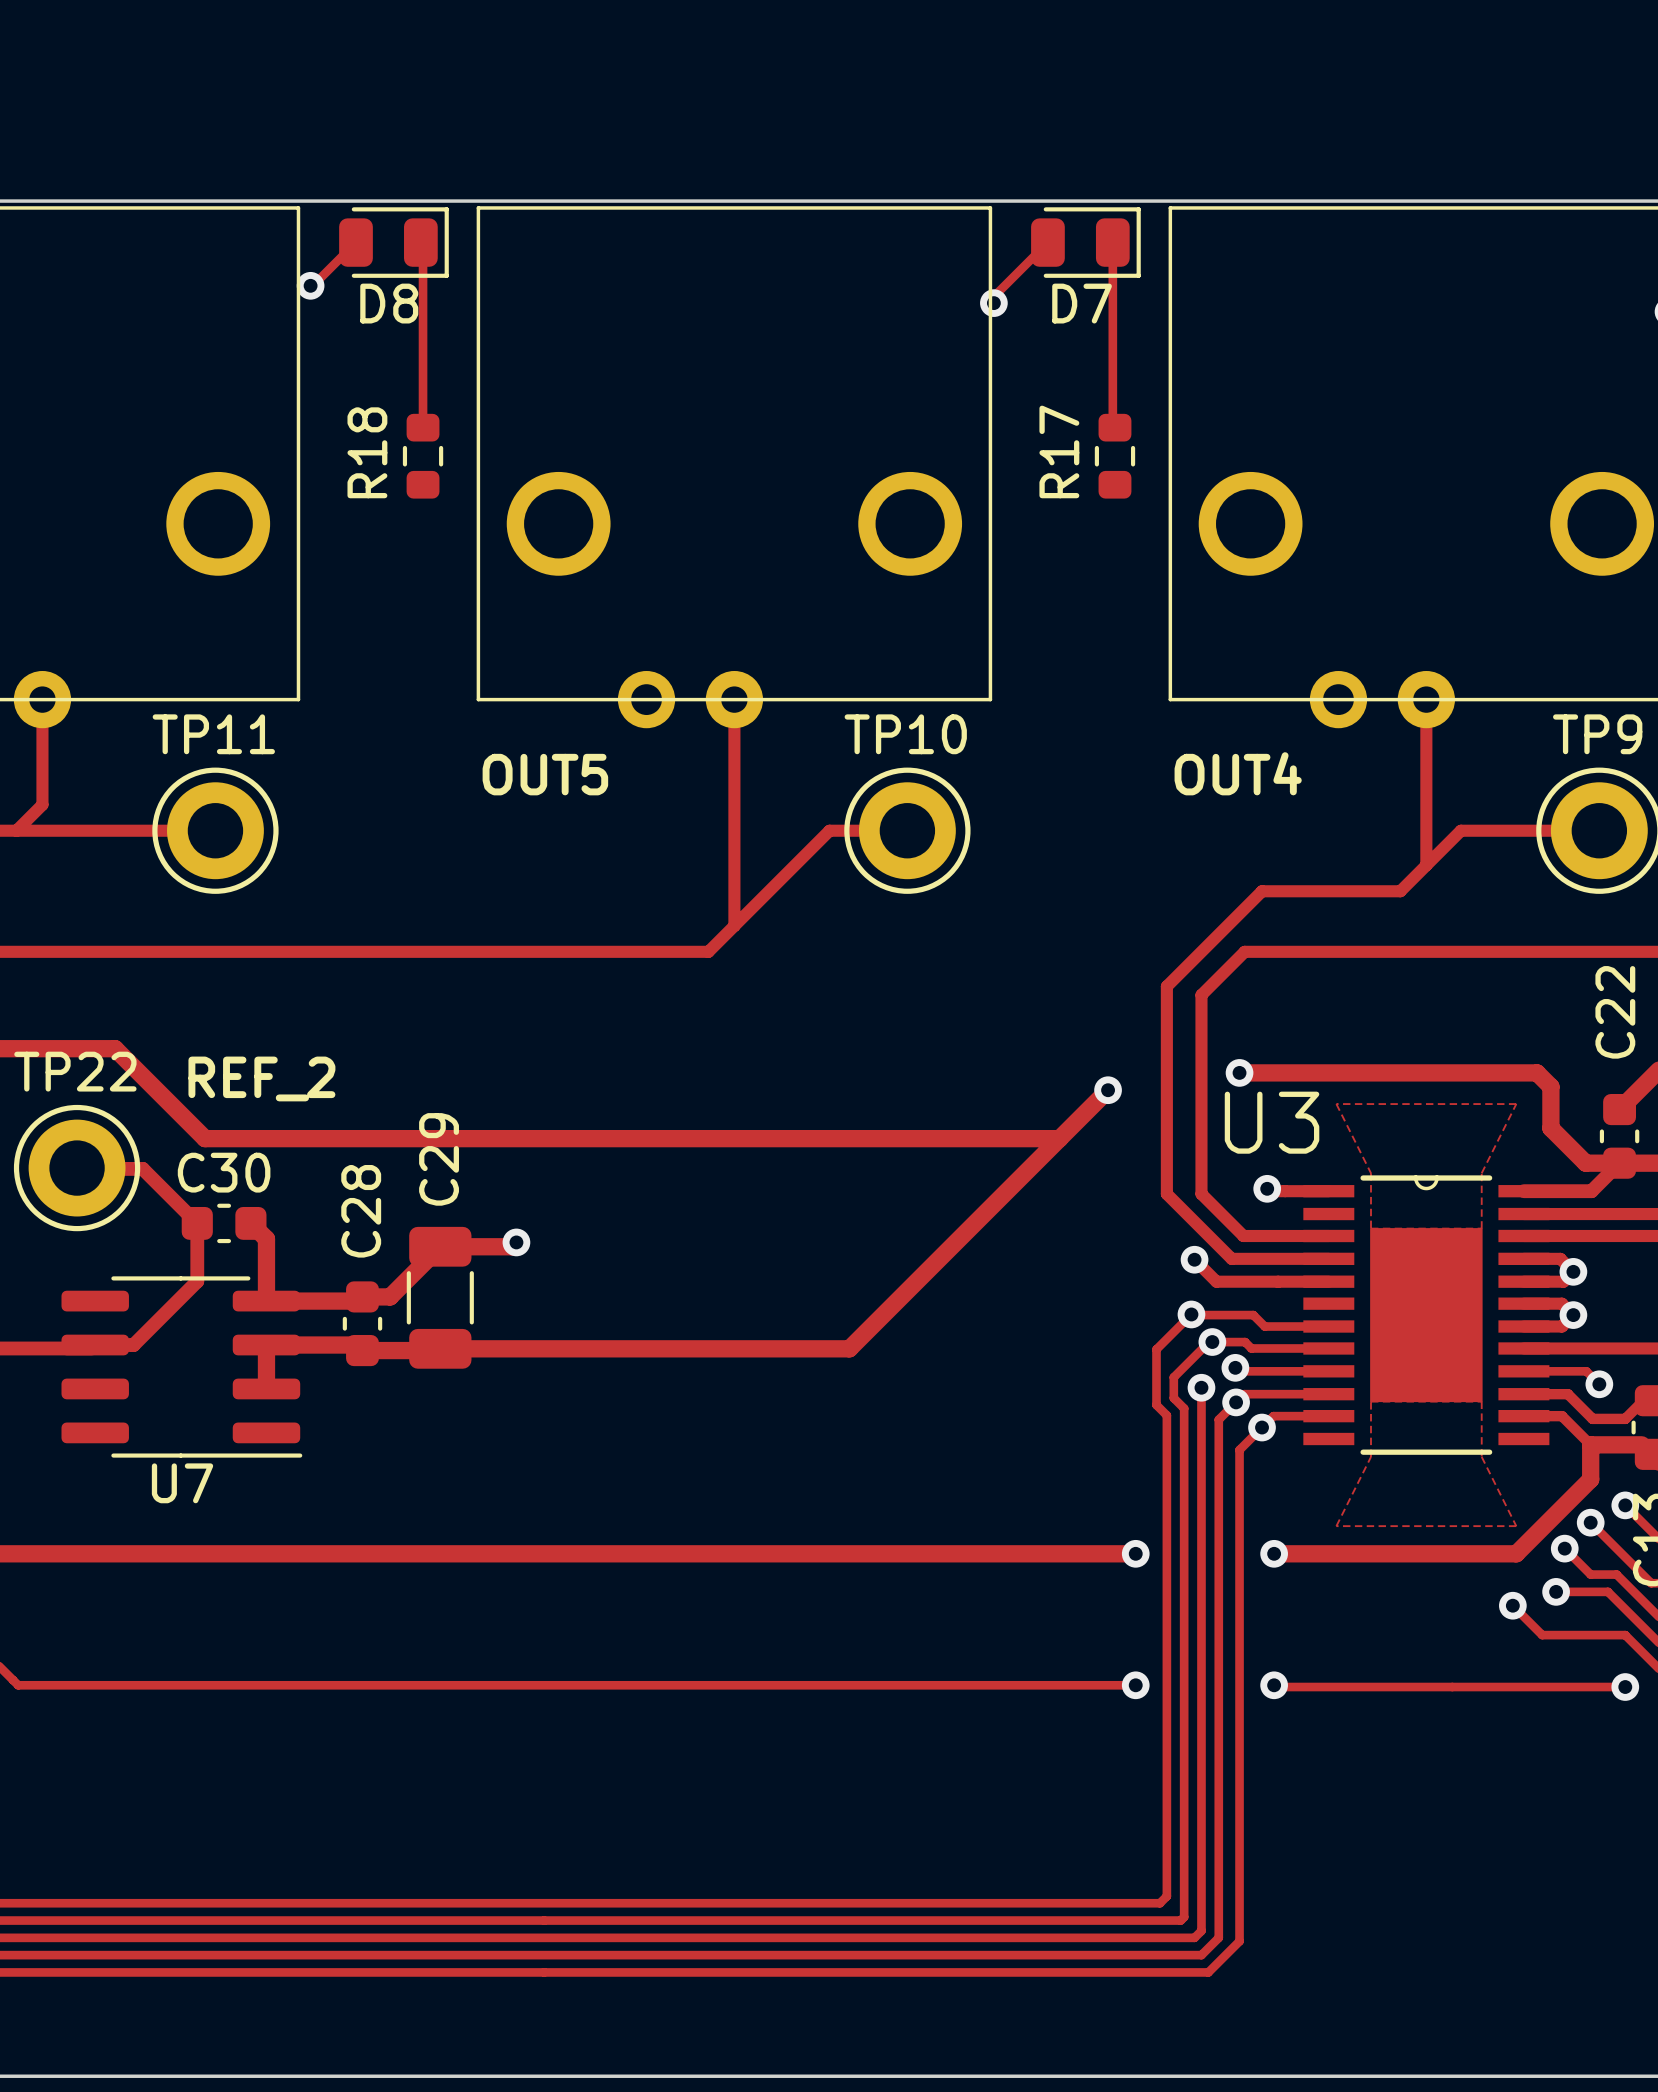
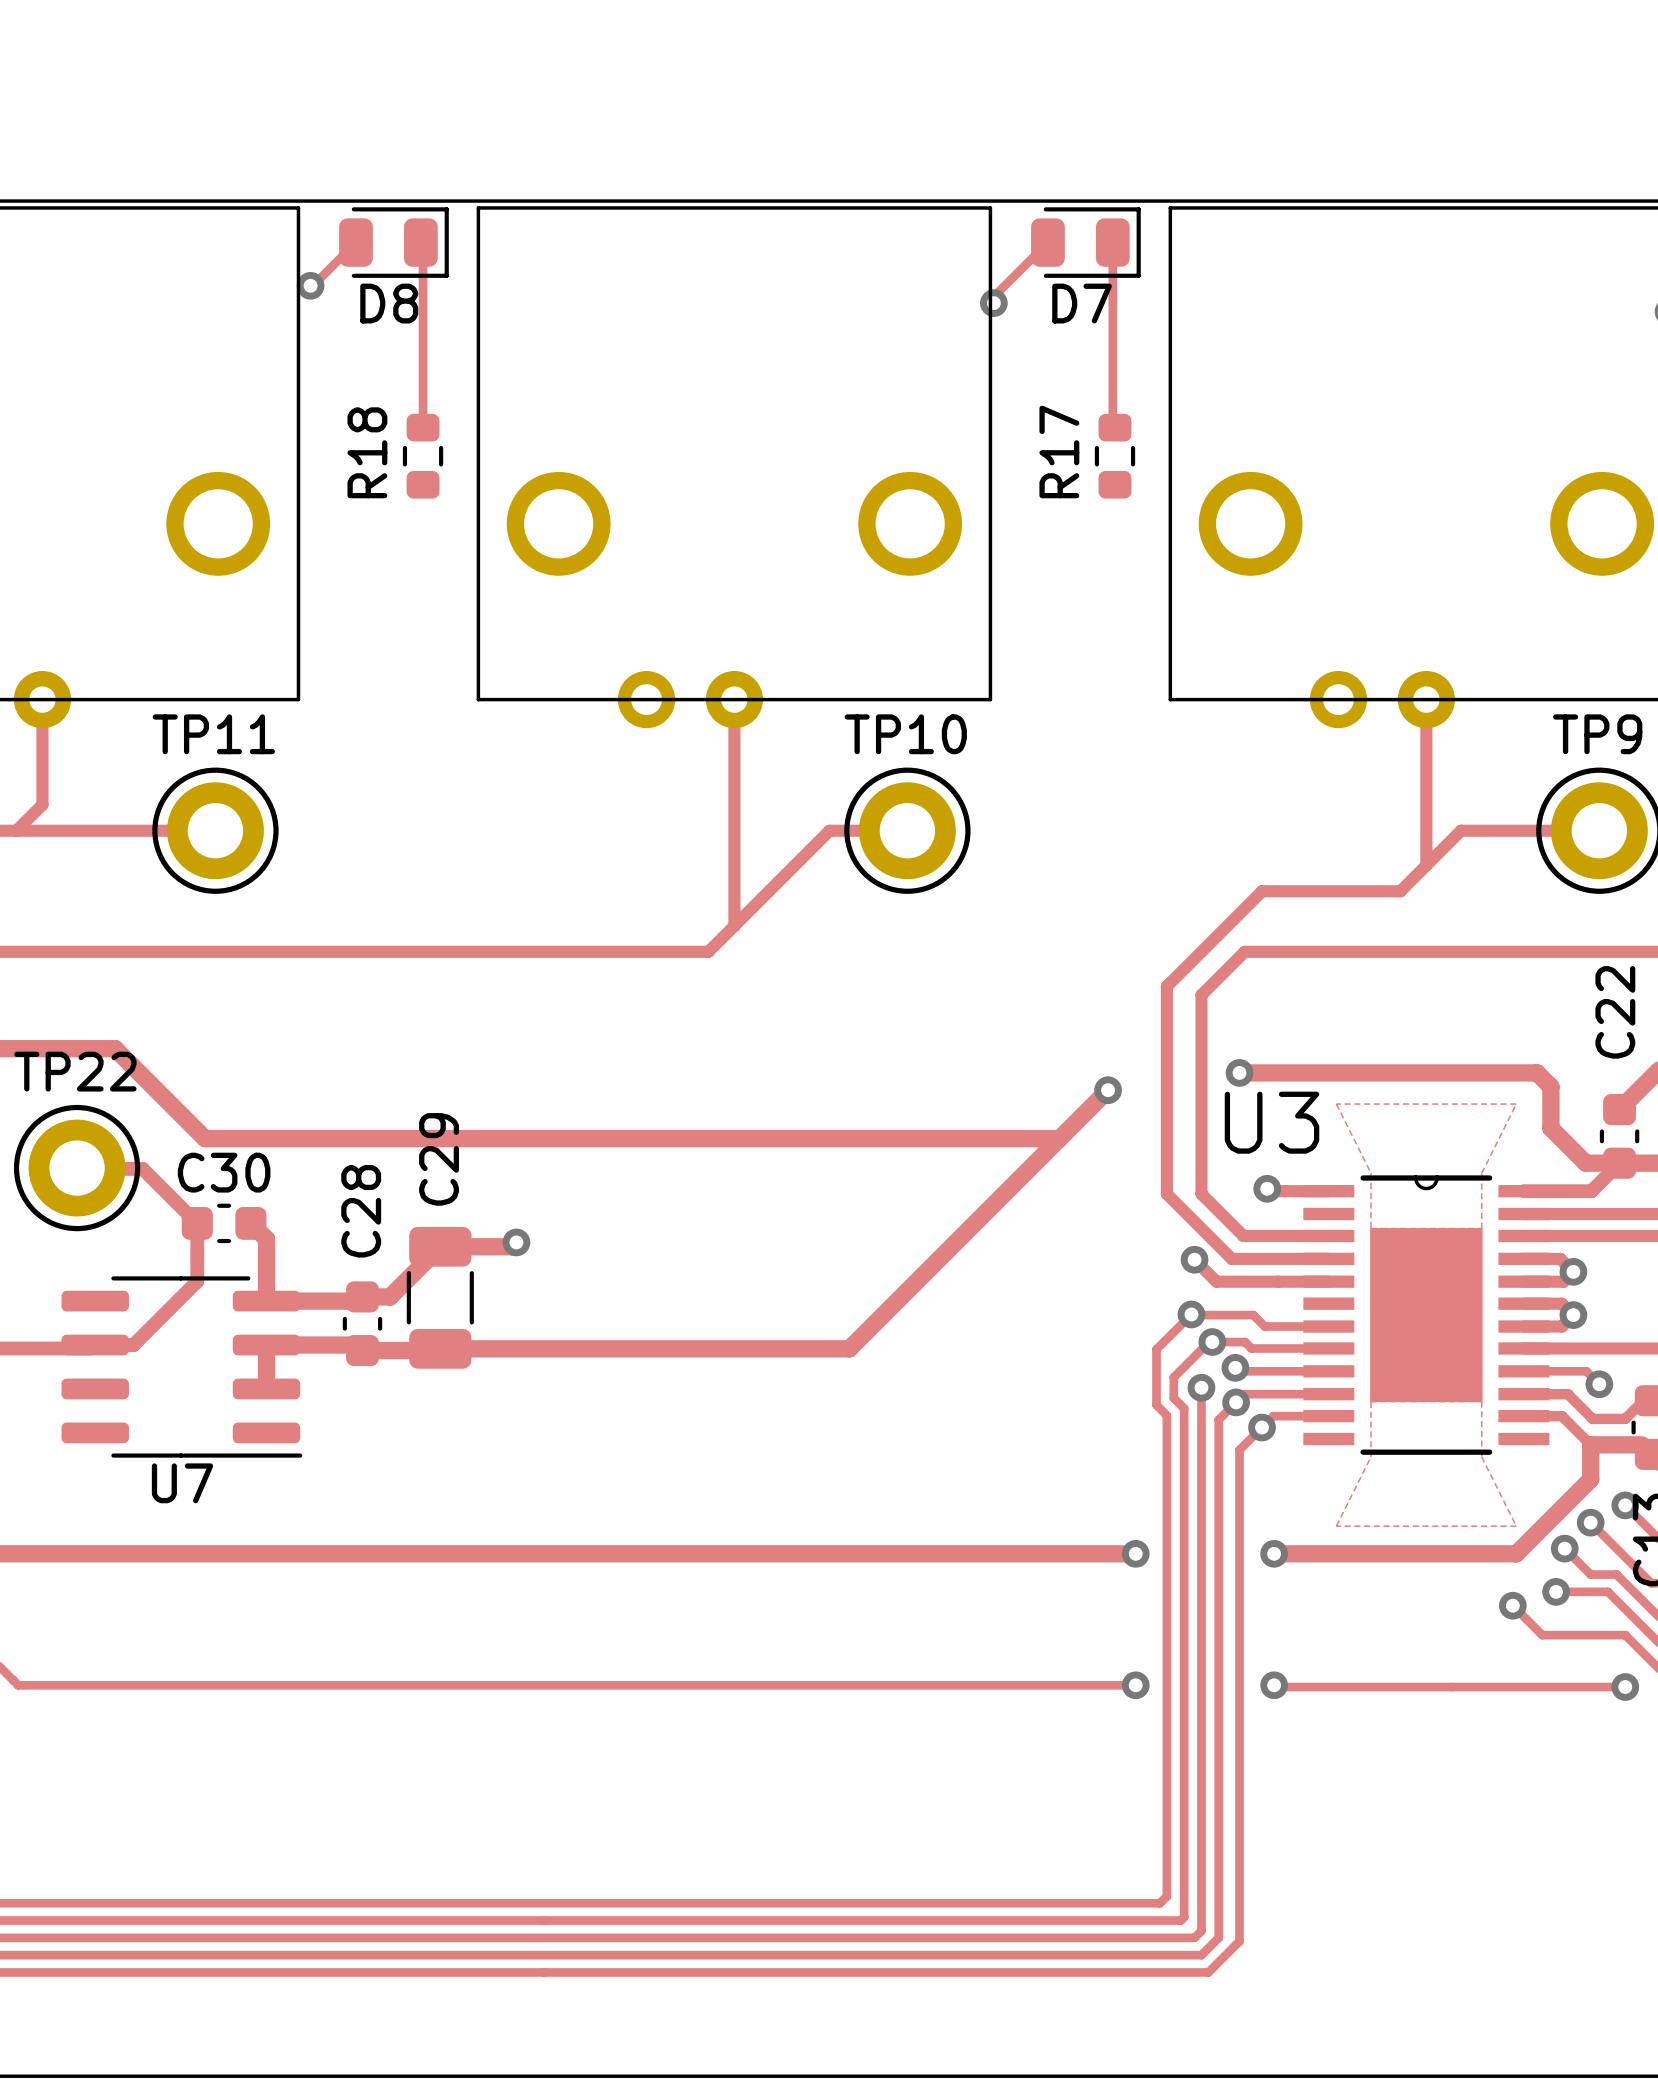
text: OUT4 (1238, 773) -> none
text: OUT5 (545, 774) -> none
text: REF_2 (261, 1078) -> none

